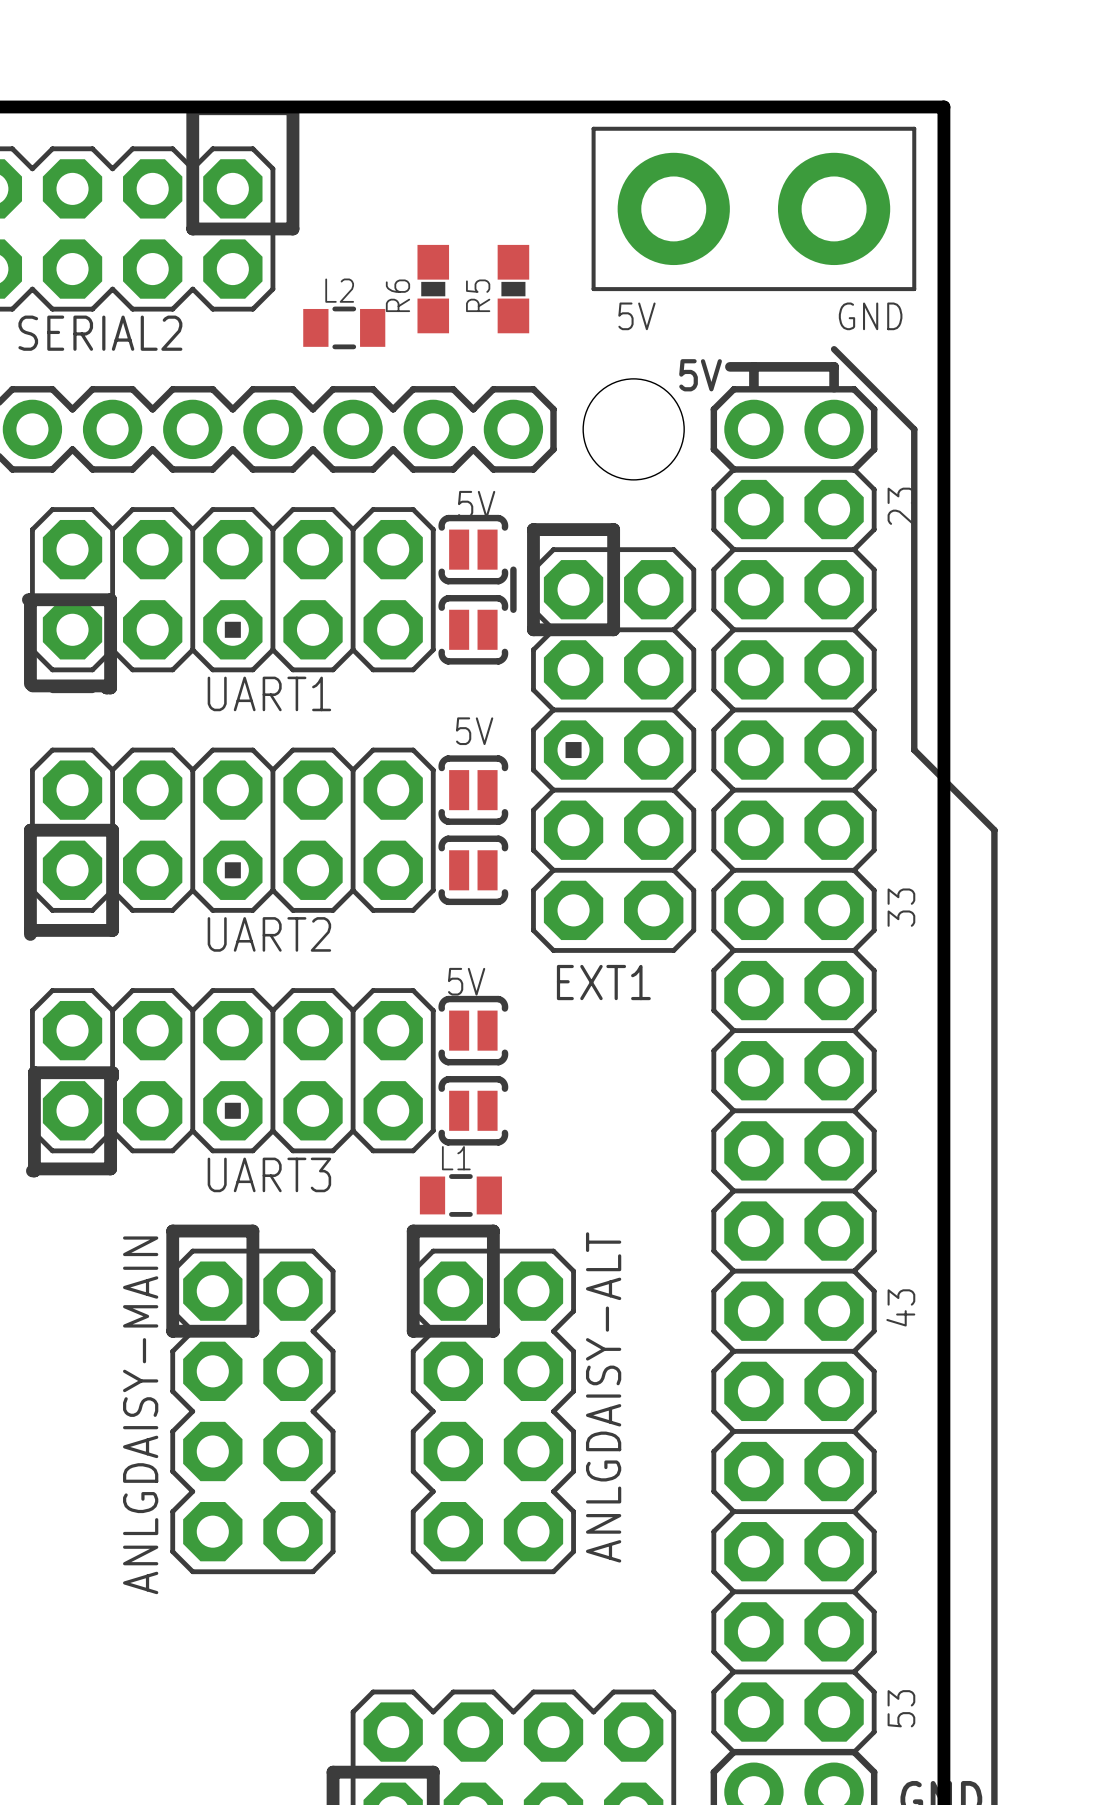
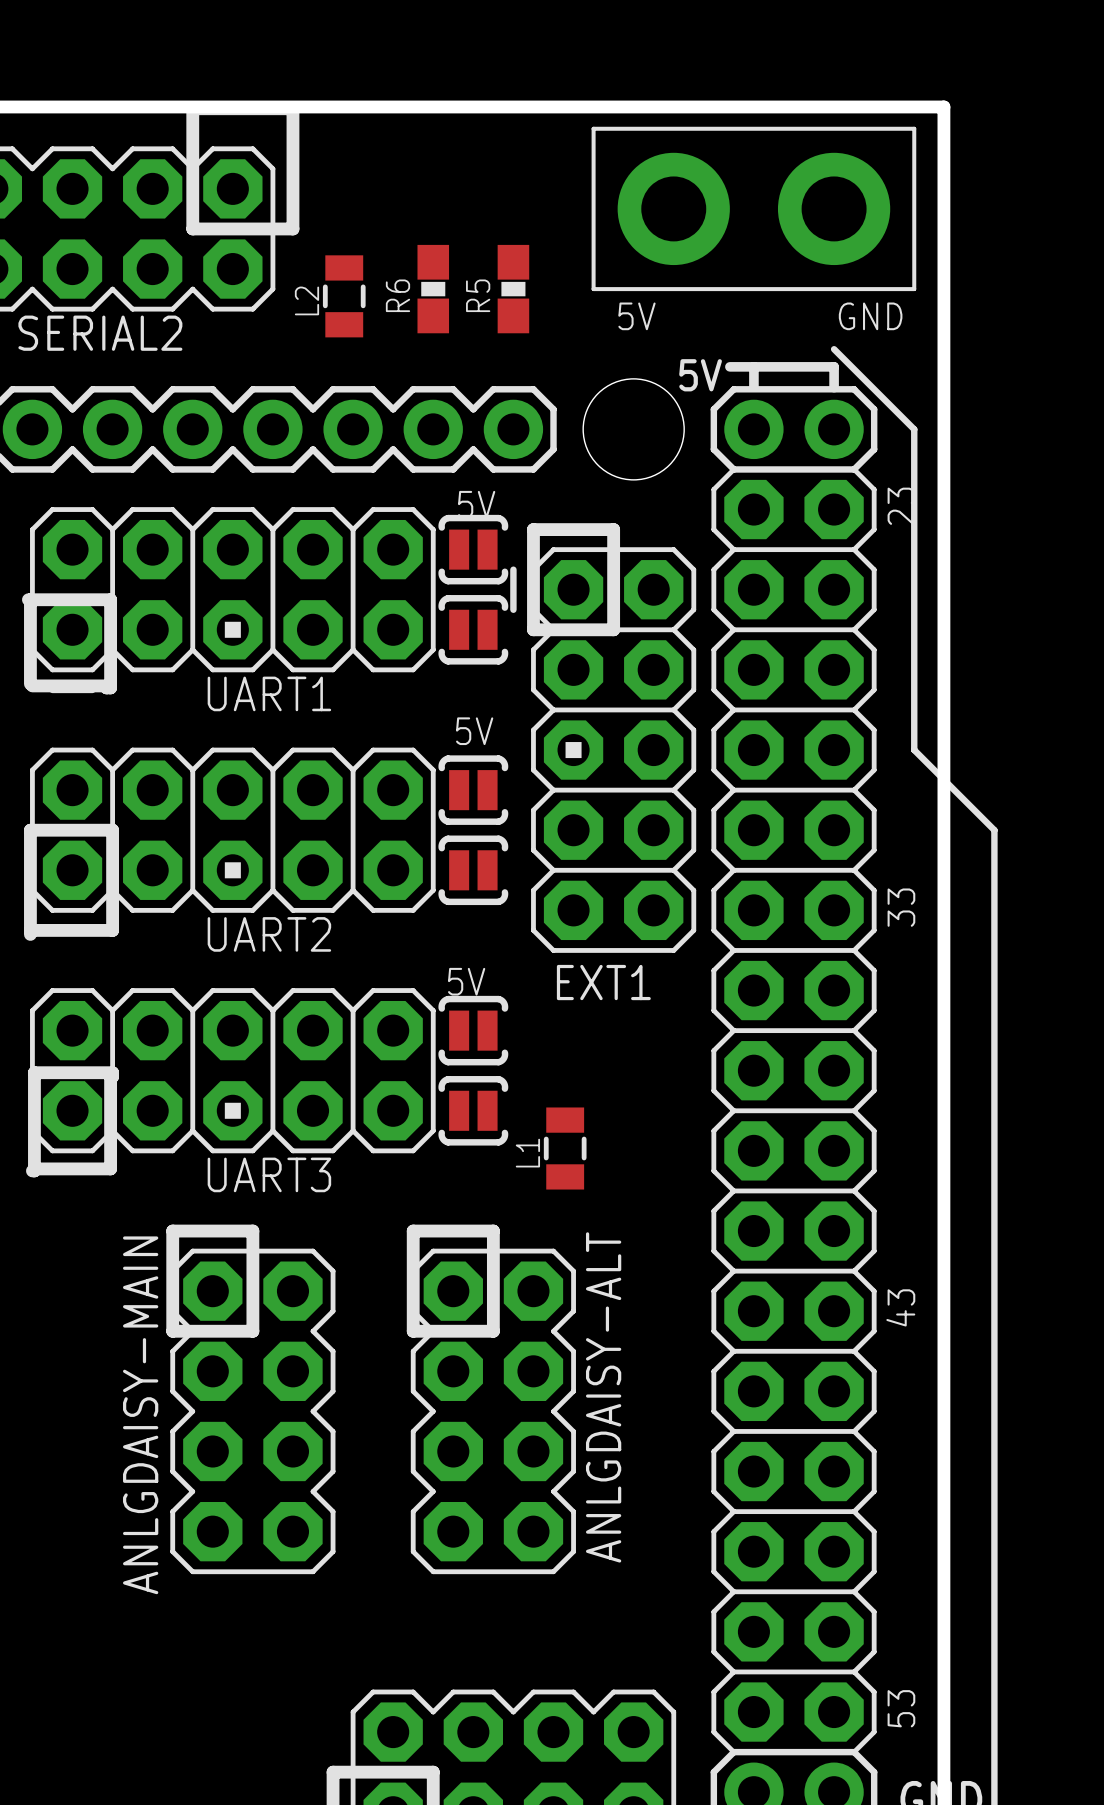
L2 rotation: 0° (344, 327) -> 90° clockwise (344, 296)
L1 rotation: 0° (460, 1195) -> 90° clockwise (565, 1148)
L1 position: (460, 1195) -> (565, 1148)

